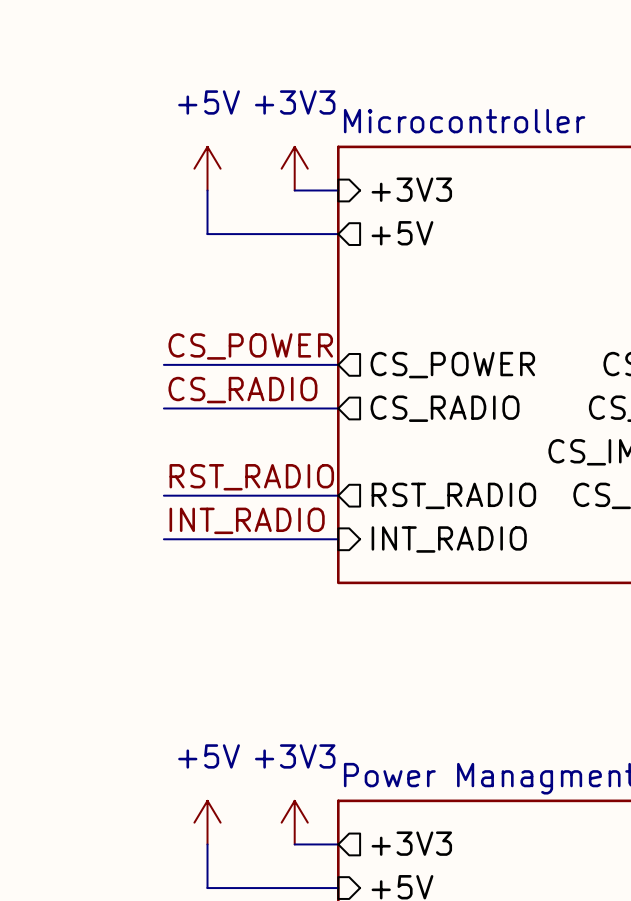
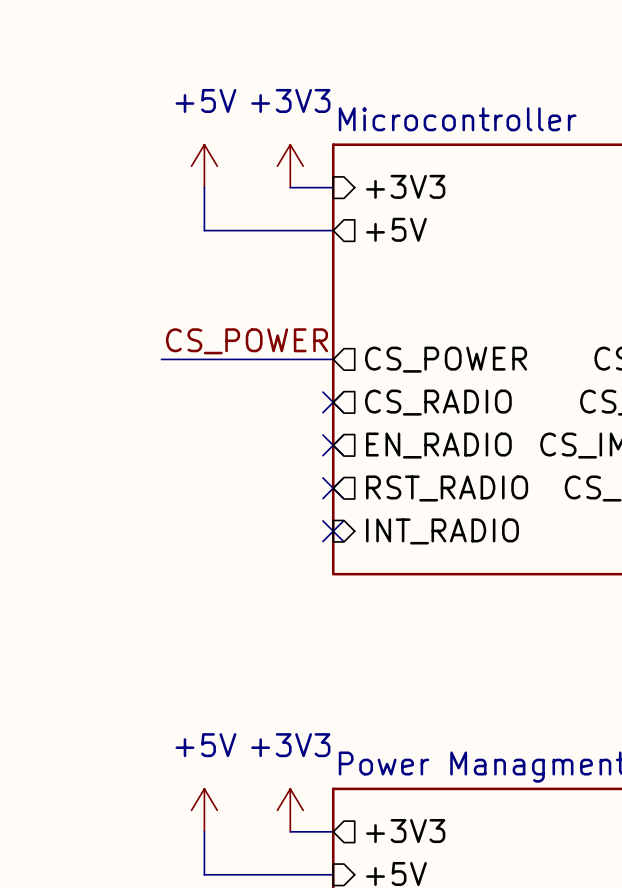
label: CS_RADIO (242, 390) -> none
wire: (163, 408) (338, 408) -> none
no-connect mark: none -> (333, 402)
no-connect mark: none -> (333, 445)
sheet pin: none -> EN_RADIO (438, 445)
label: RST_RADIO (251, 477) -> none
wire: (163, 495) (338, 495) -> none
no-connect mark: none -> (333, 488)
label: INT_RADIO (247, 520) -> none
wire: (163, 539) (338, 539) -> none
no-connect mark: none -> (333, 531)

